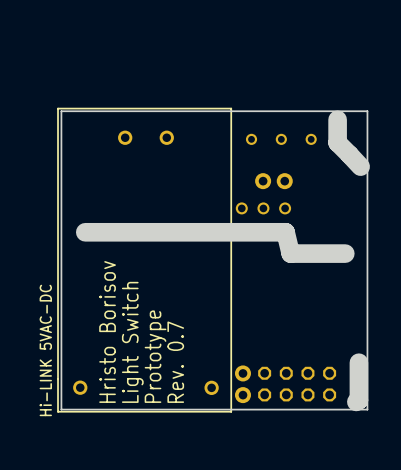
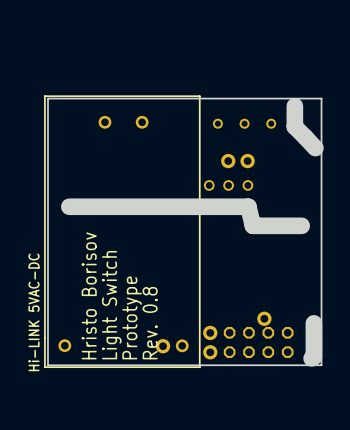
part: none -> (264, 318)
text: Rev. 0.7 (175, 362) -> Rev. 0.8 (150, 323)
part: none -> (163, 346)

